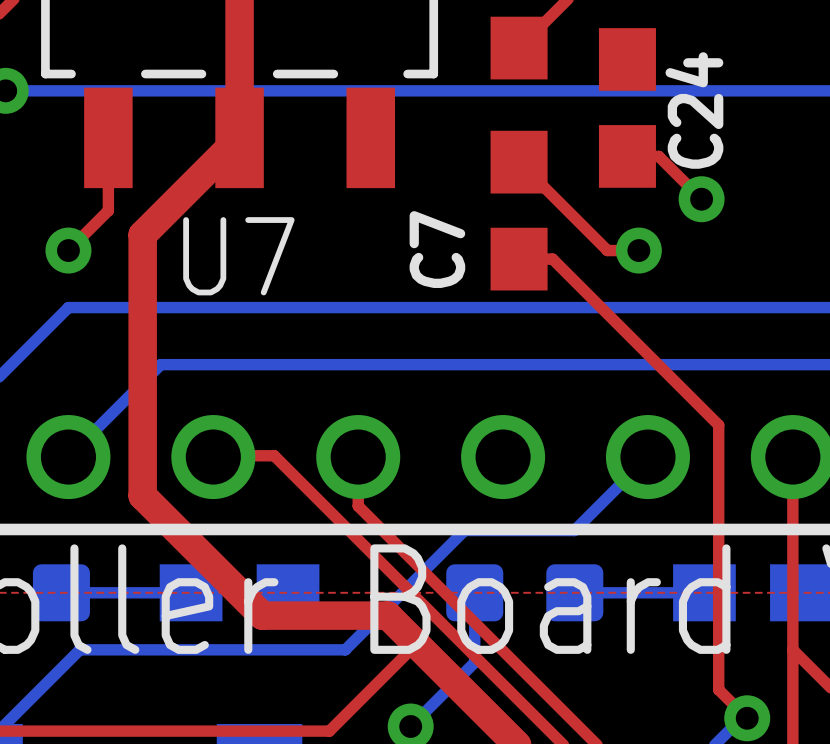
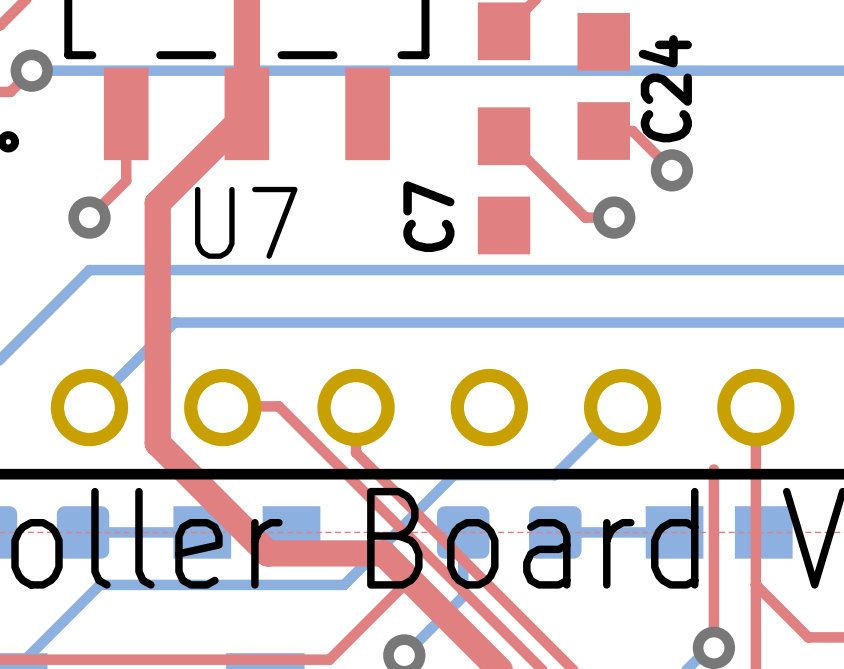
top track: (519, 259) (552, 259) (718, 425) (718, 689) (747, 718) -> (713, 469) (713, 647)

